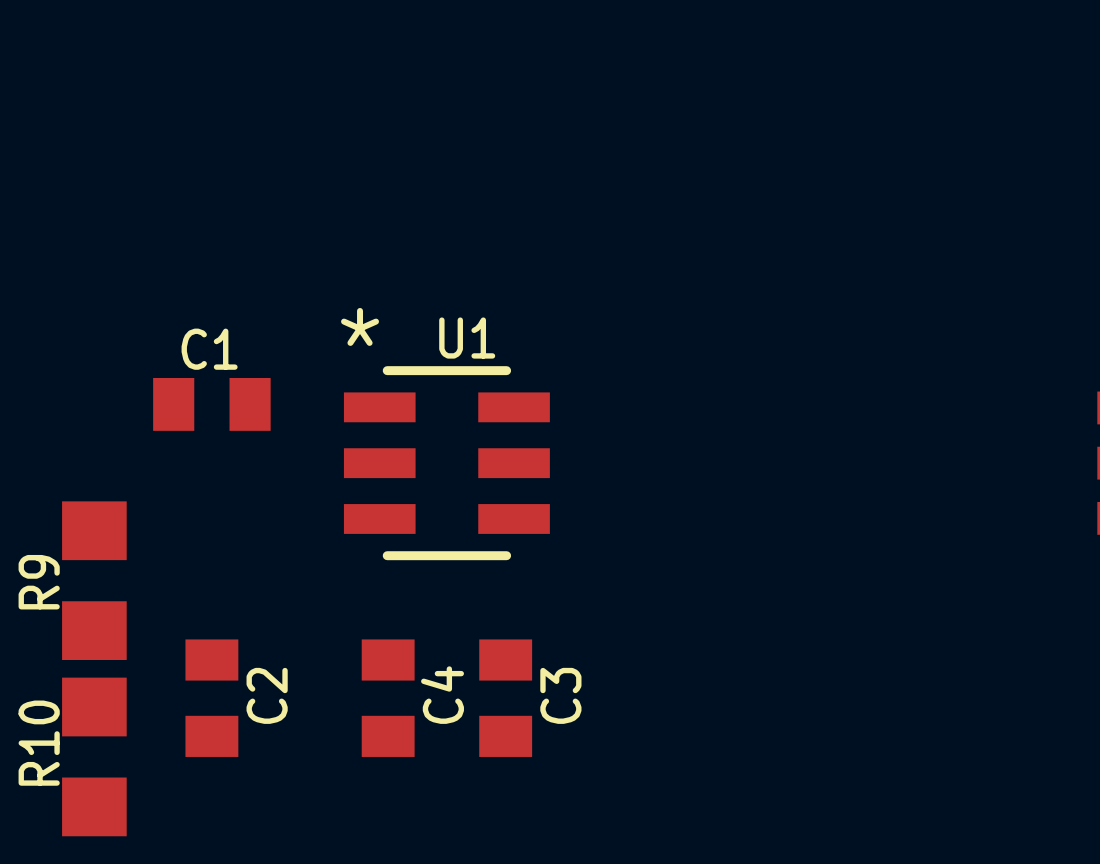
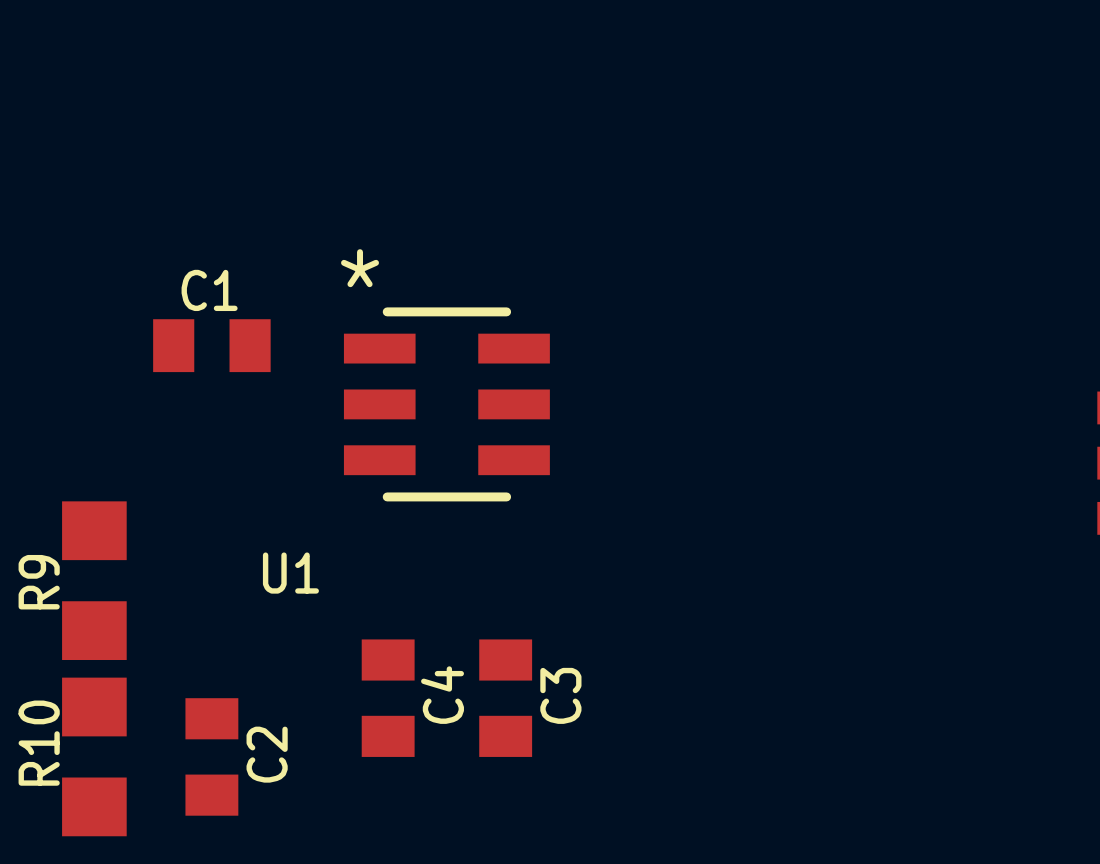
U1 name position: U1 (467, 338) -> U1 (290, 573)
C1 position: (211, 404) -> (211, 345)
U1 position: (446, 463) -> (446, 404)
C2 position: (211, 698) -> (211, 756)

